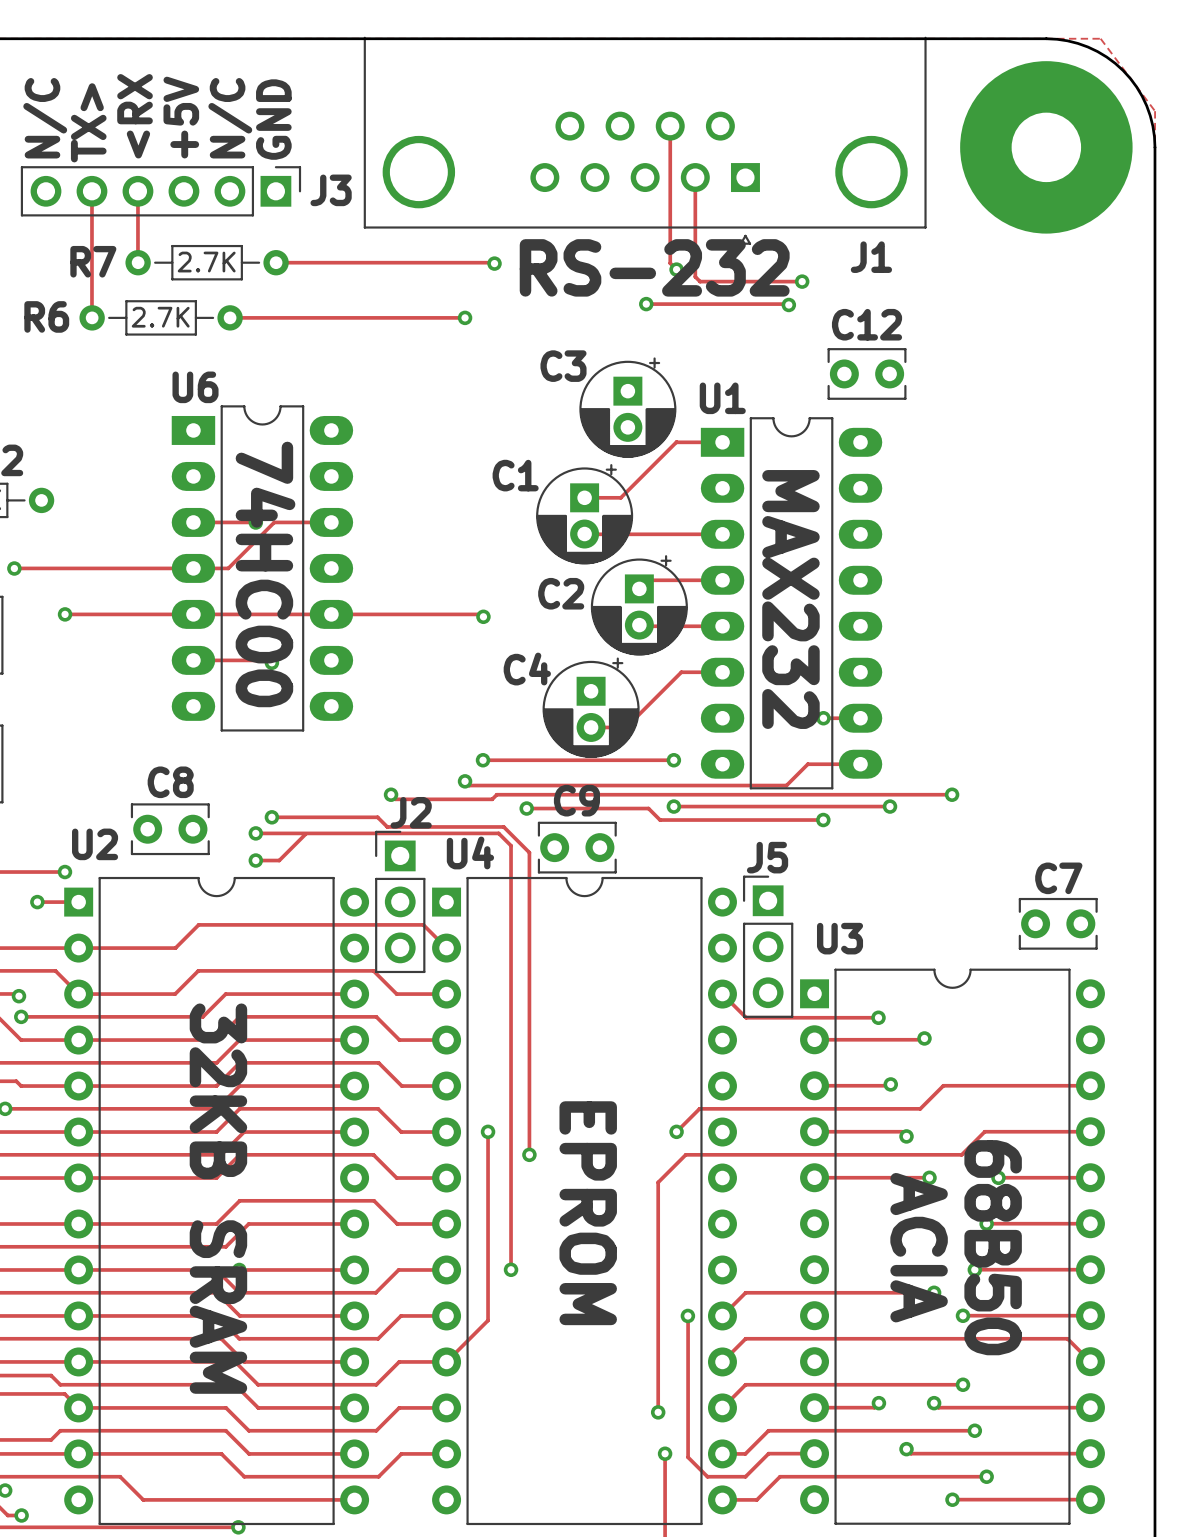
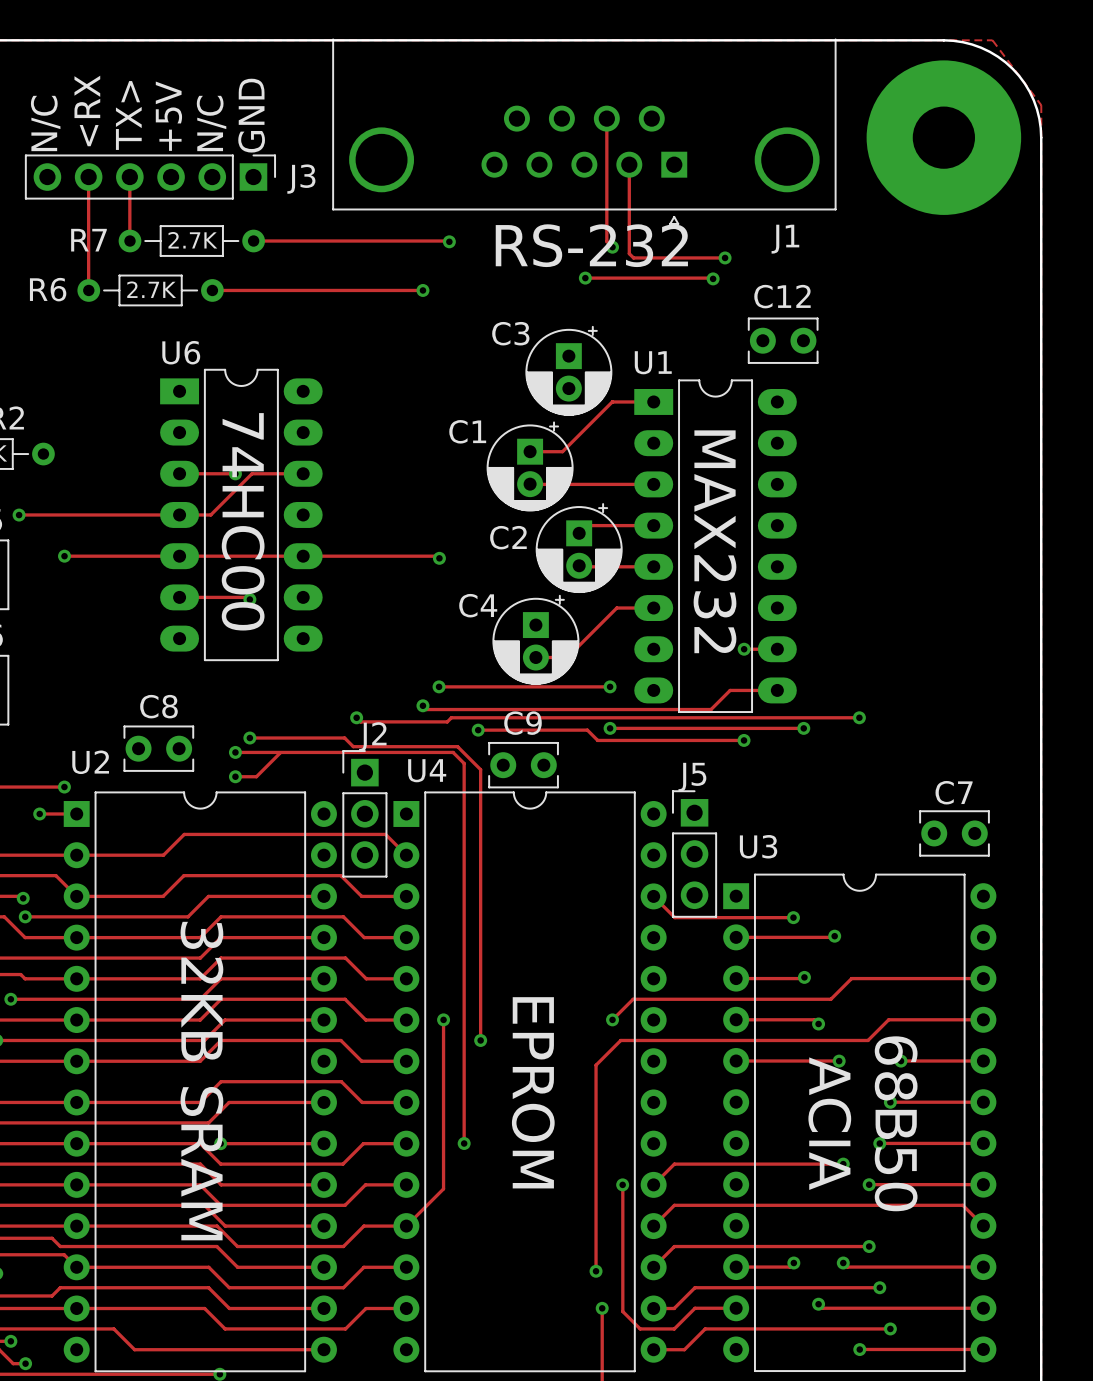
text position: <RX (135, 116) -> <RX (87, 110)
text position: TX> (88, 122) -> TX> (128, 115)

